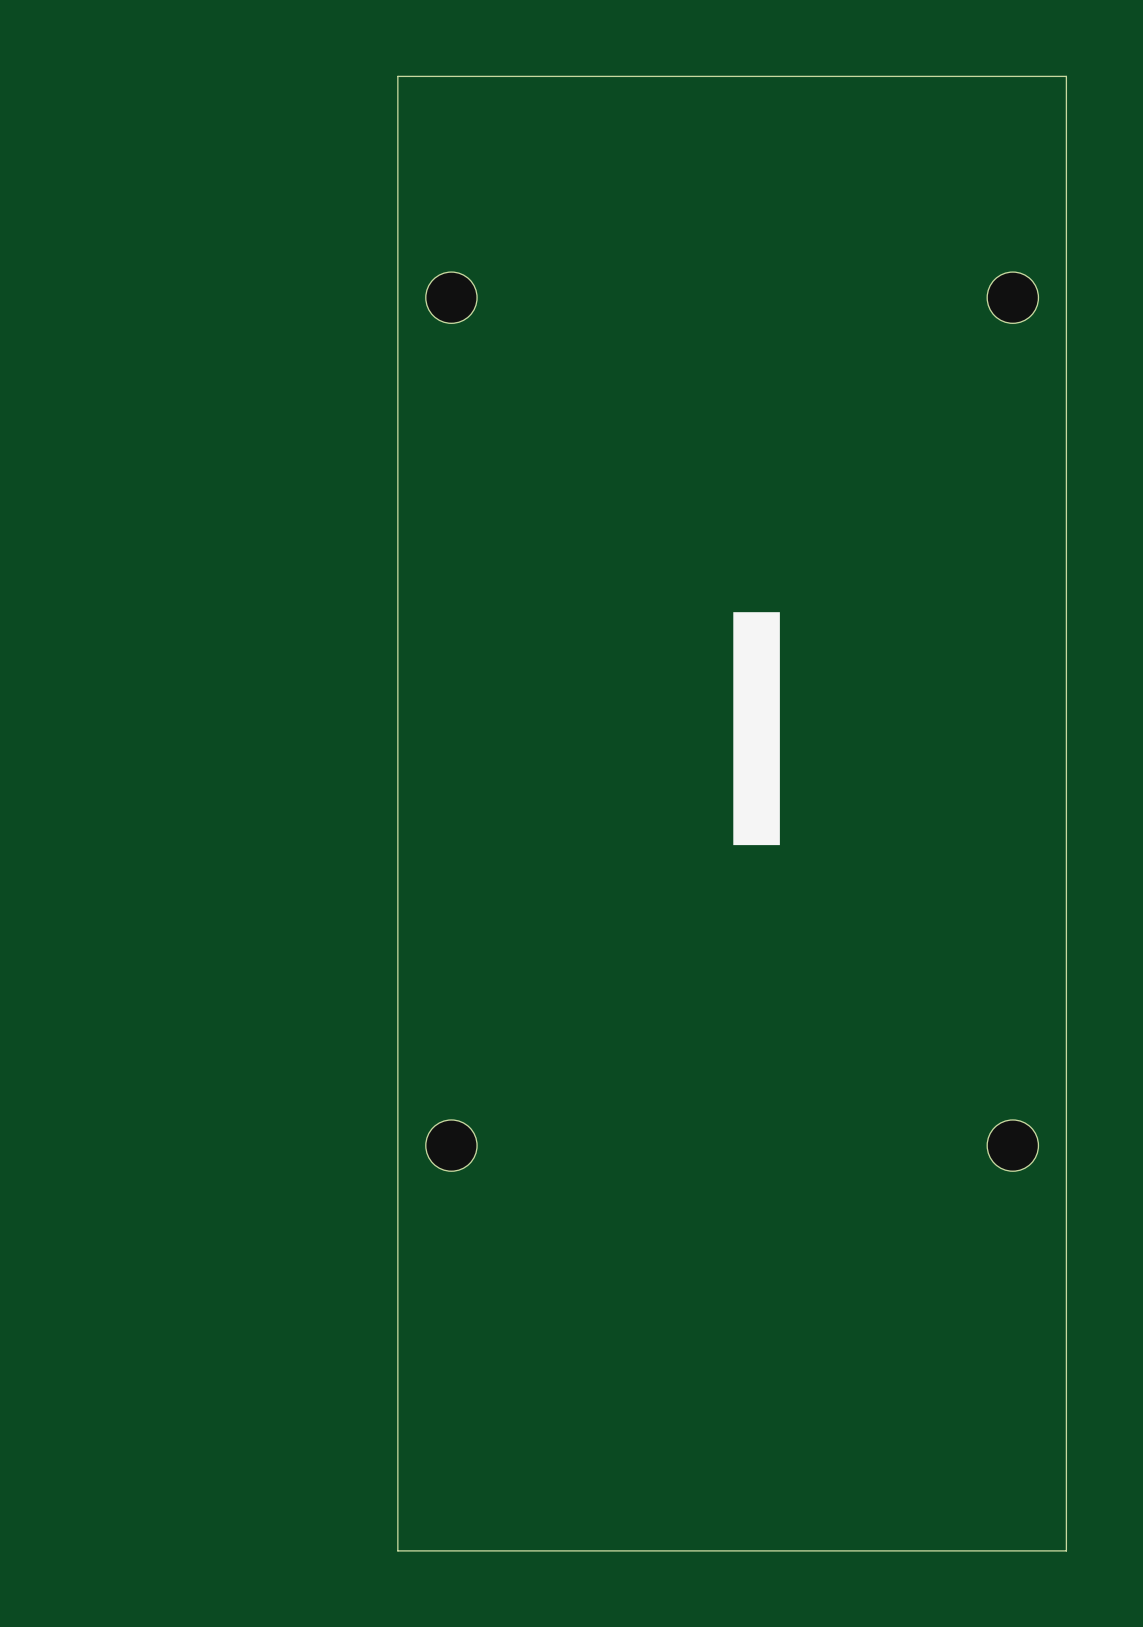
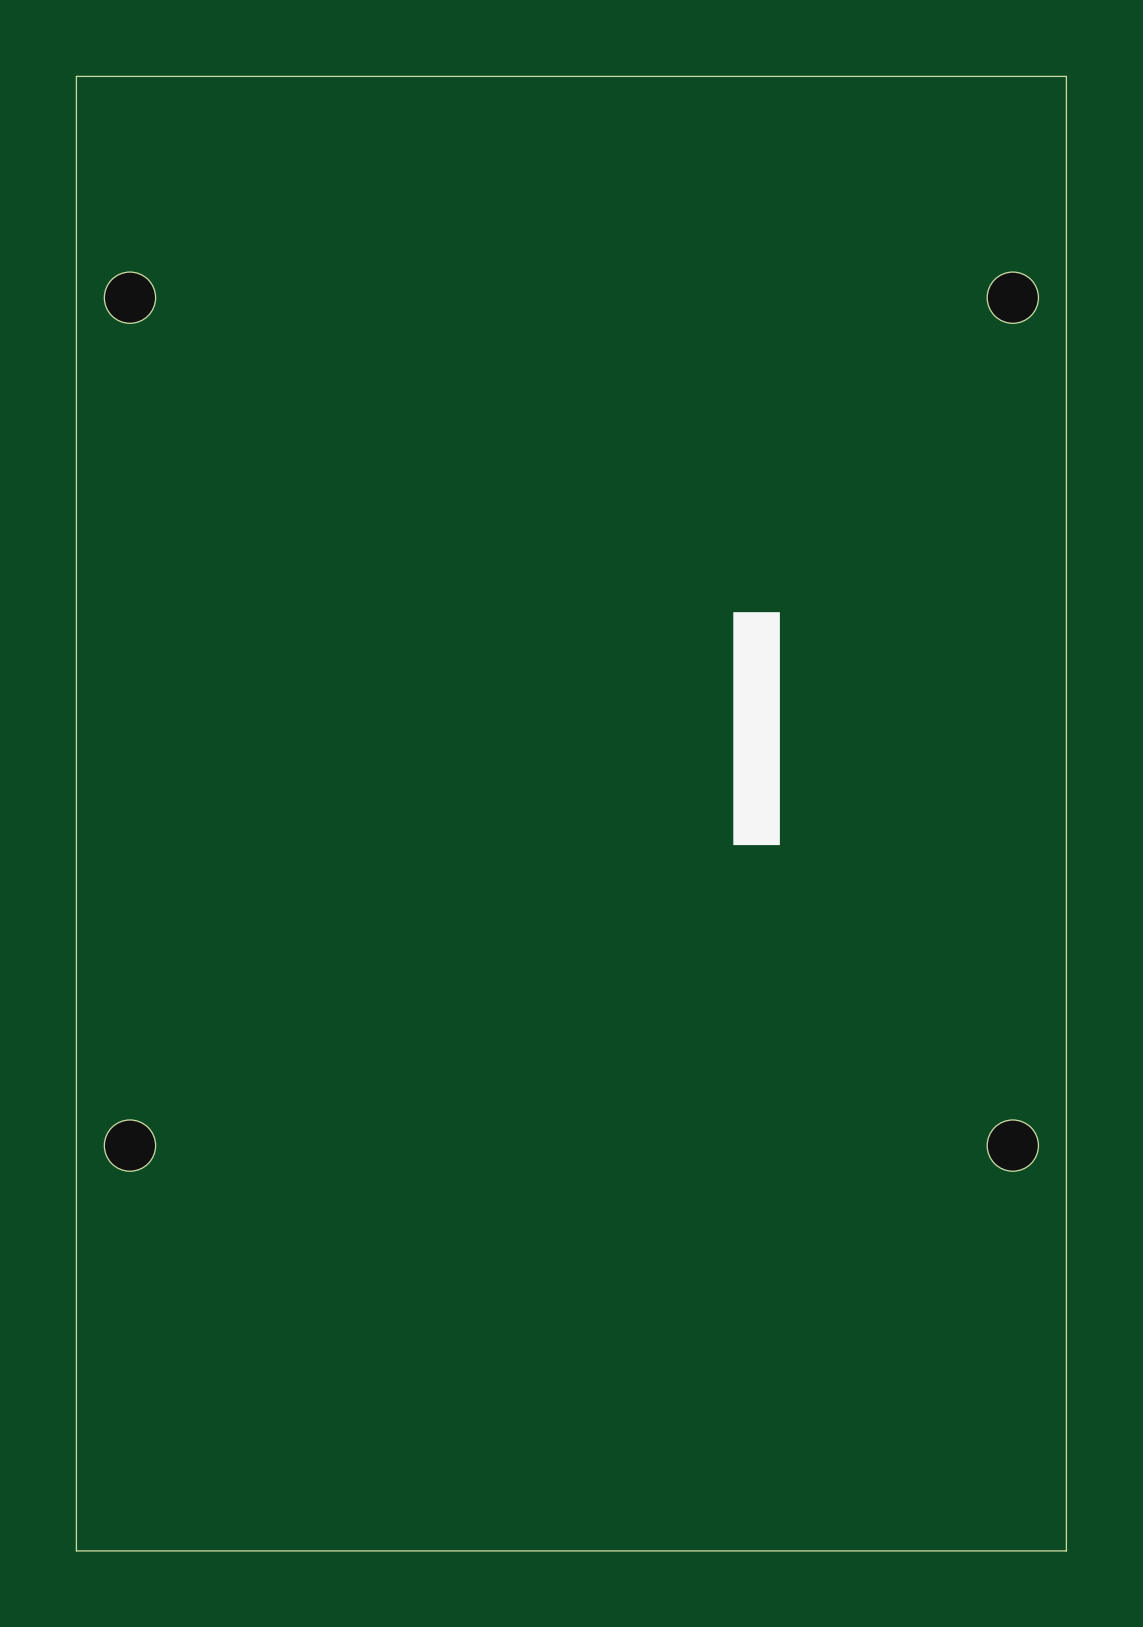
board edge: (397, 76) (397, 1550) -> (397, 76) (76, 76) (76, 1550) (397, 1550)
part position: (451, 297) -> (129, 297)
part position: (451, 1145) -> (129, 1145)

